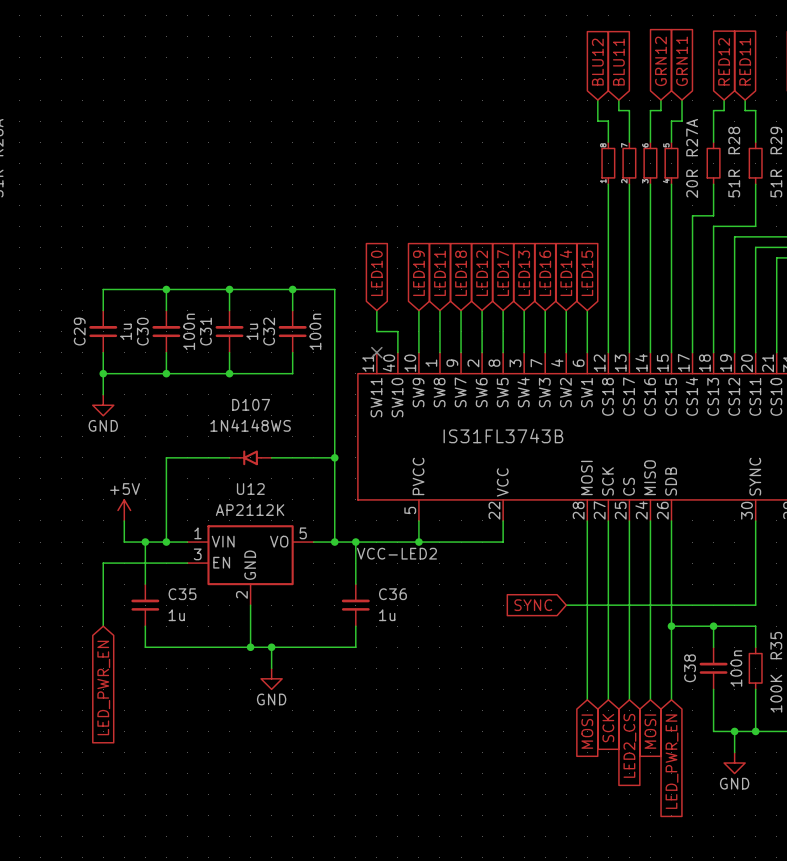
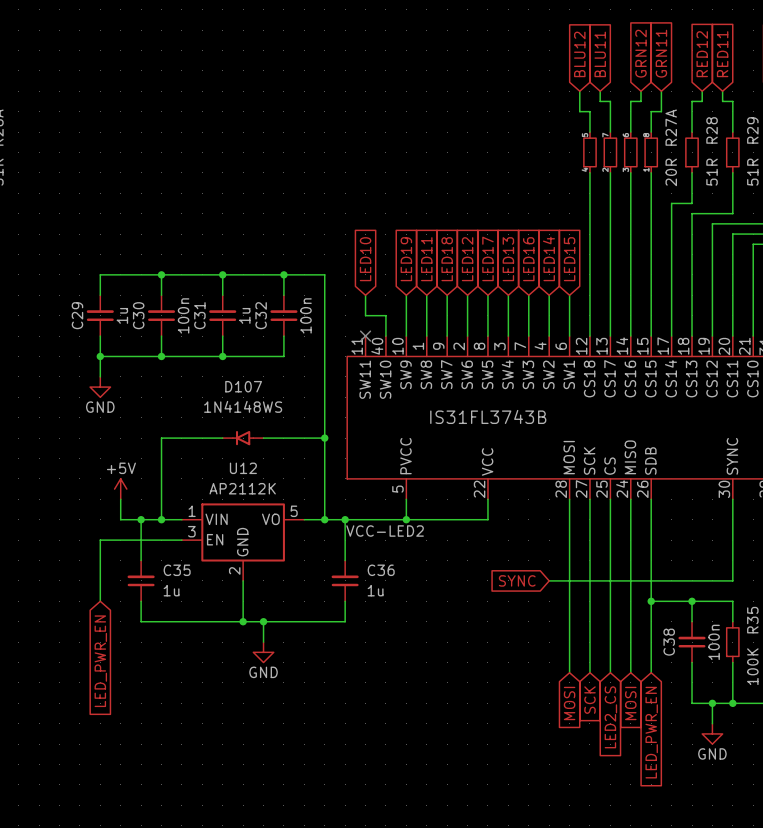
R27A position: (608, 163) -> (651, 152)
part: none -> (589, 152)
part: (671, 163) -> none

